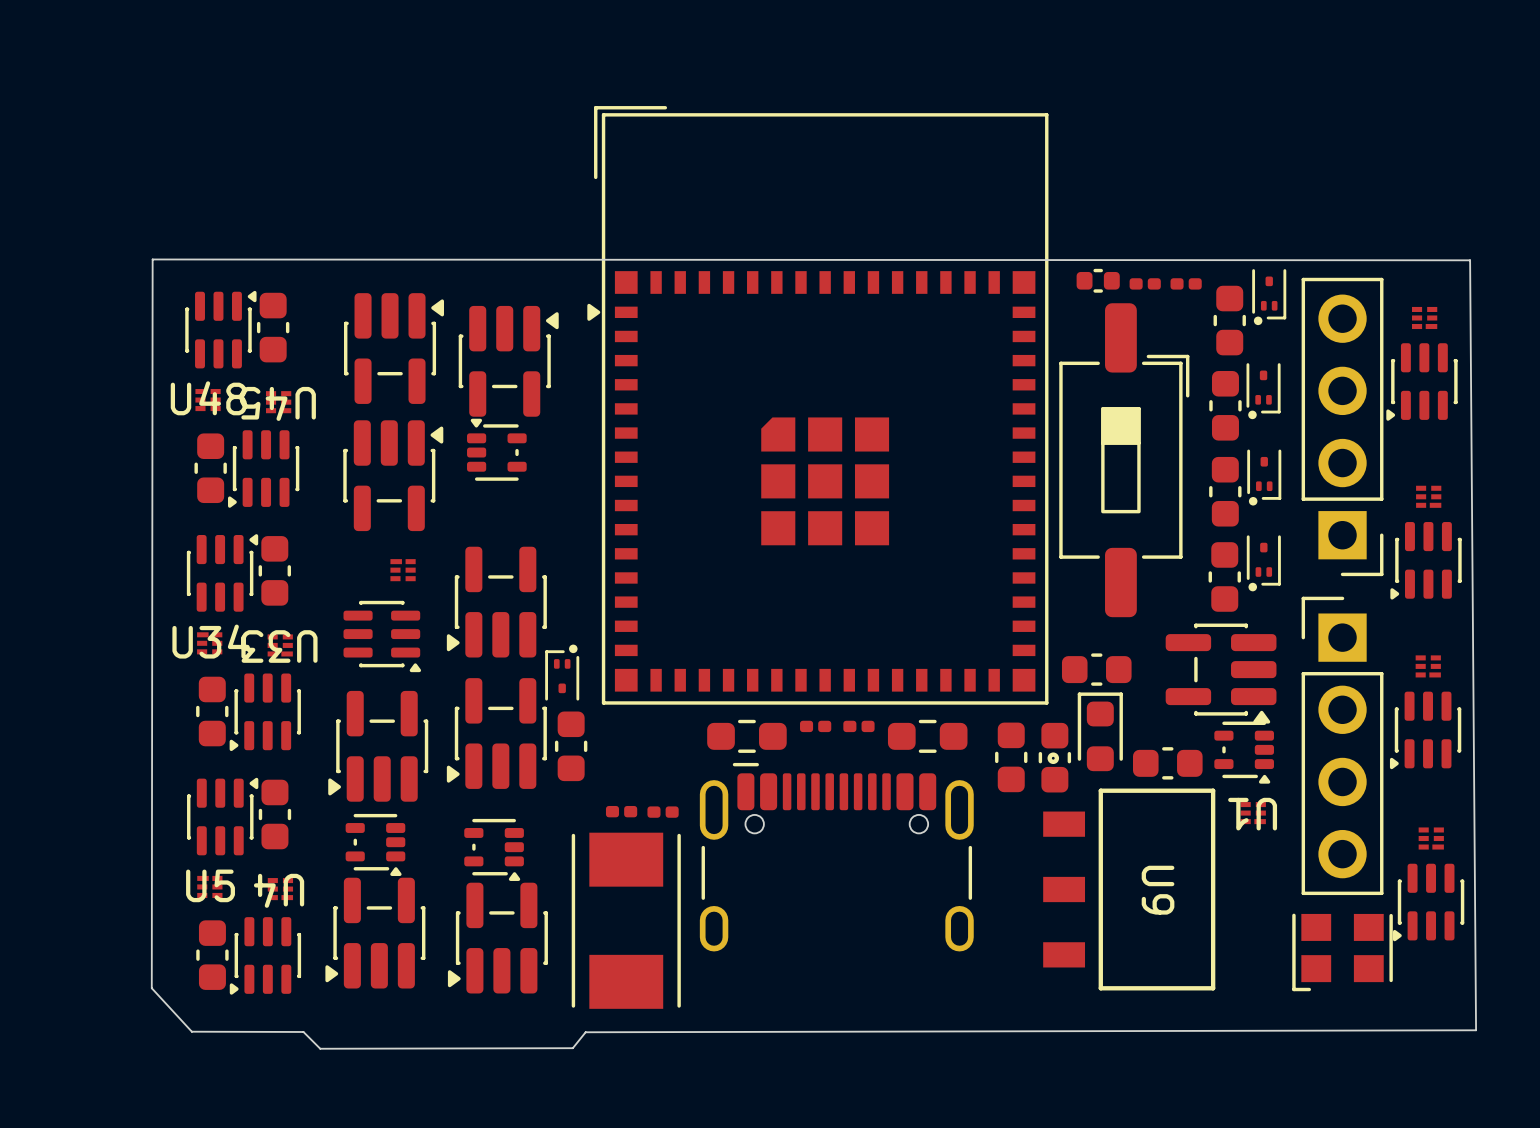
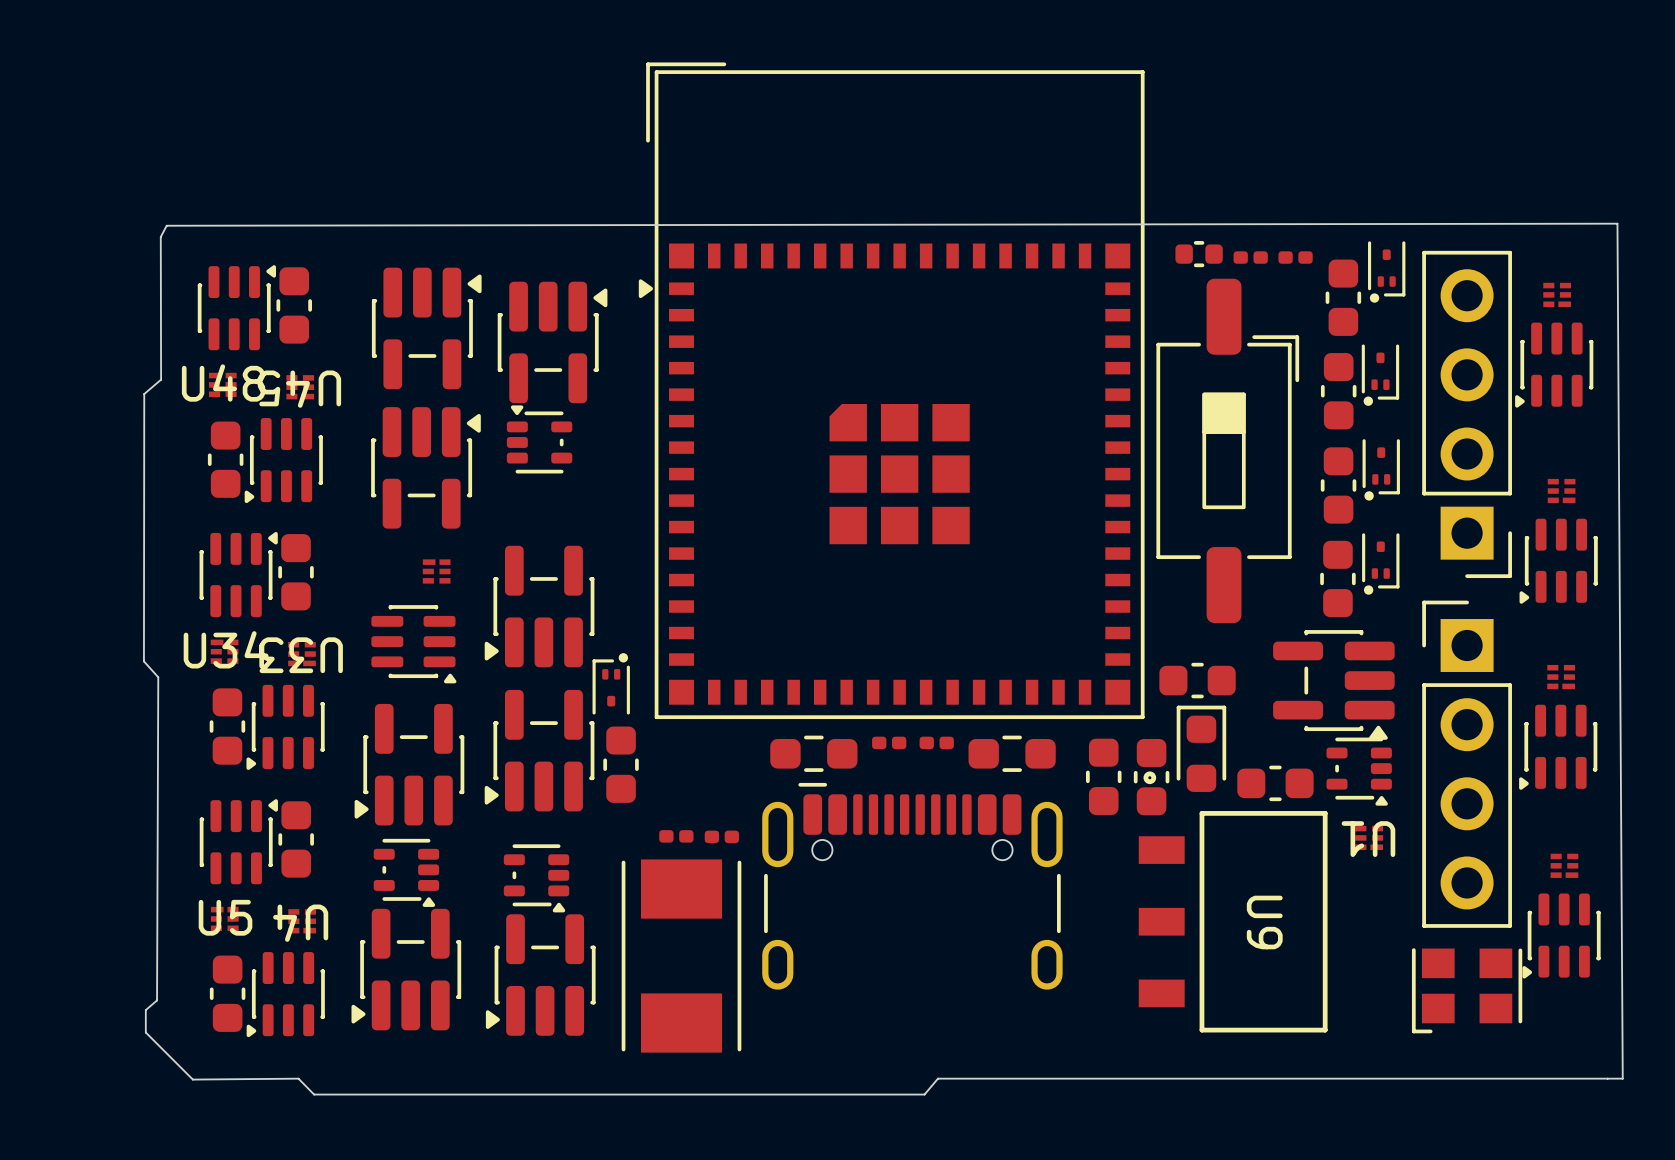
board edge: (152, 259) (151, 988) (191, 1031) (303, 1031) (320, 1048) (572, 1048) (585, 1032) (1476, 1030) (1470, 260) (152, 259) -> (1617, 223) (166, 225) (160, 236) (161, 379) (144, 394) (143, 661) (158, 677) (157, 1000) (145, 1010) (145, 1032) (192, 1079) (298, 1078) (314, 1094) (924, 1094) (937, 1078) (1622, 1078) (1617, 223)

